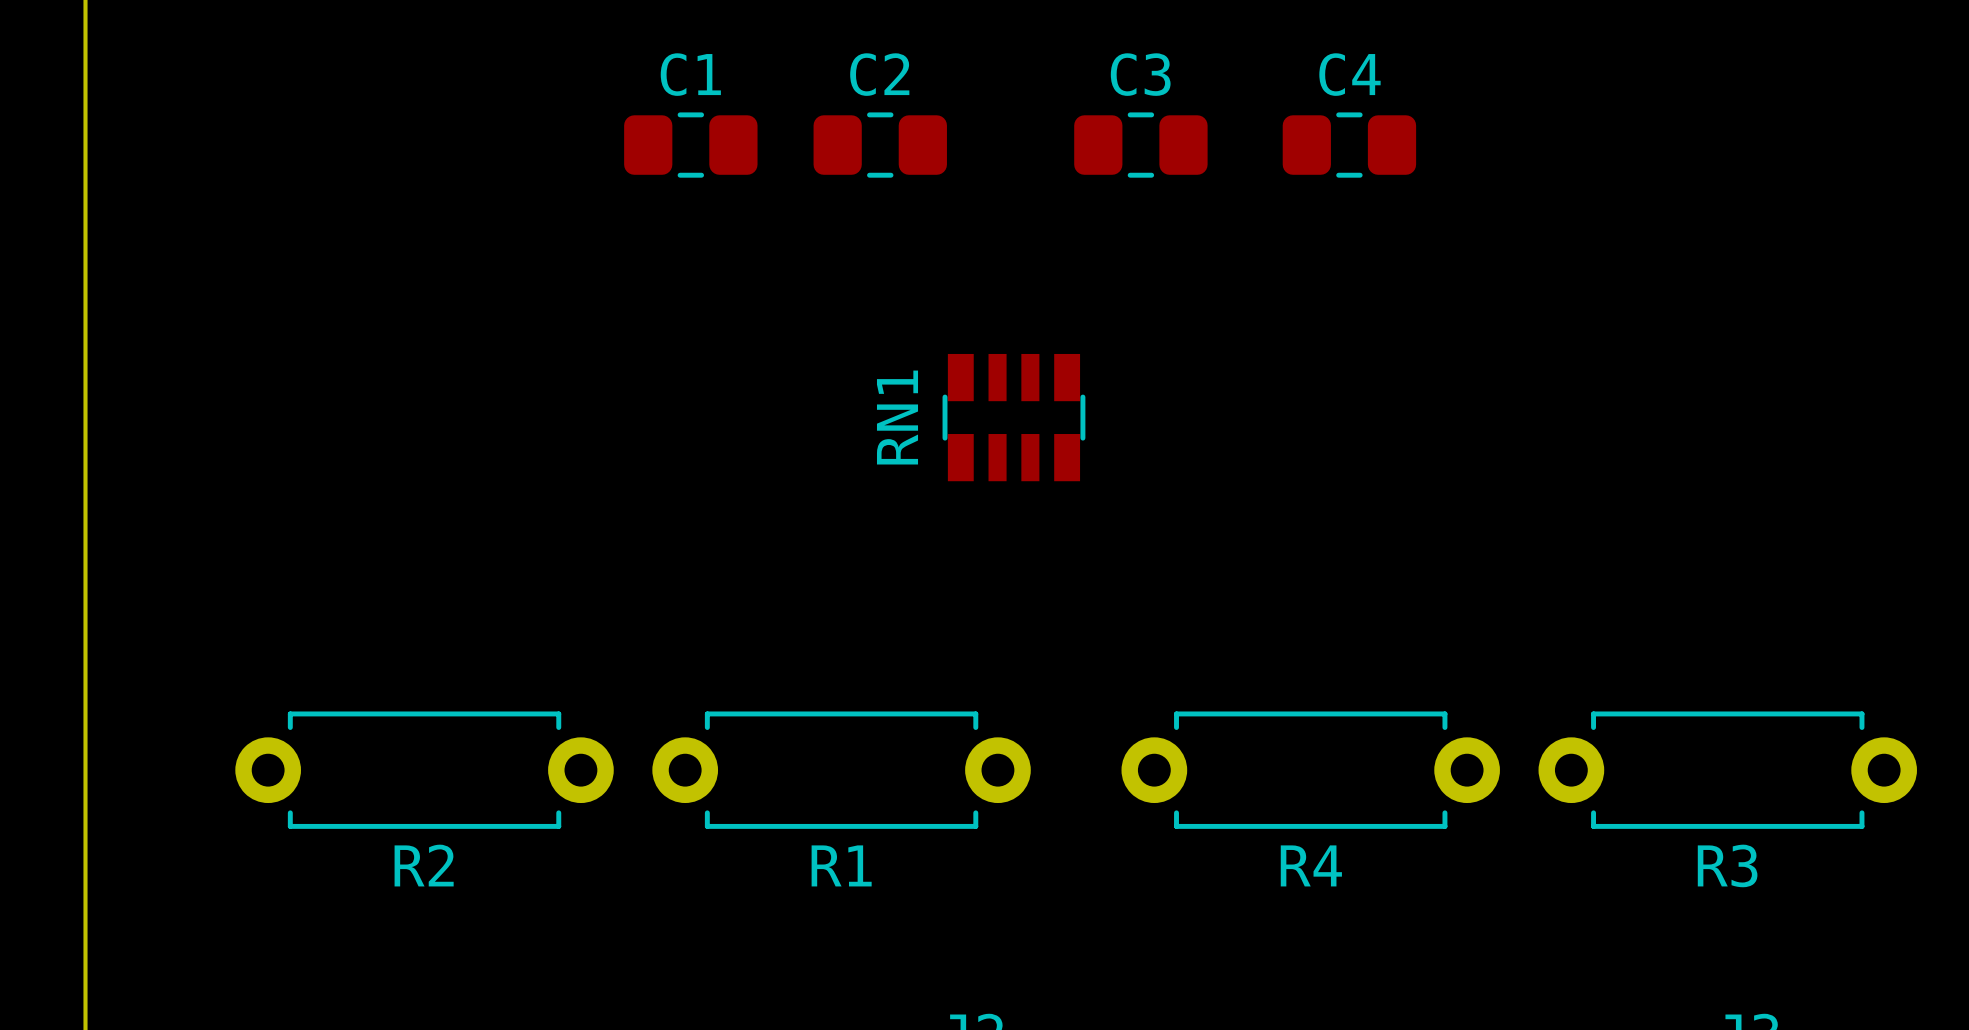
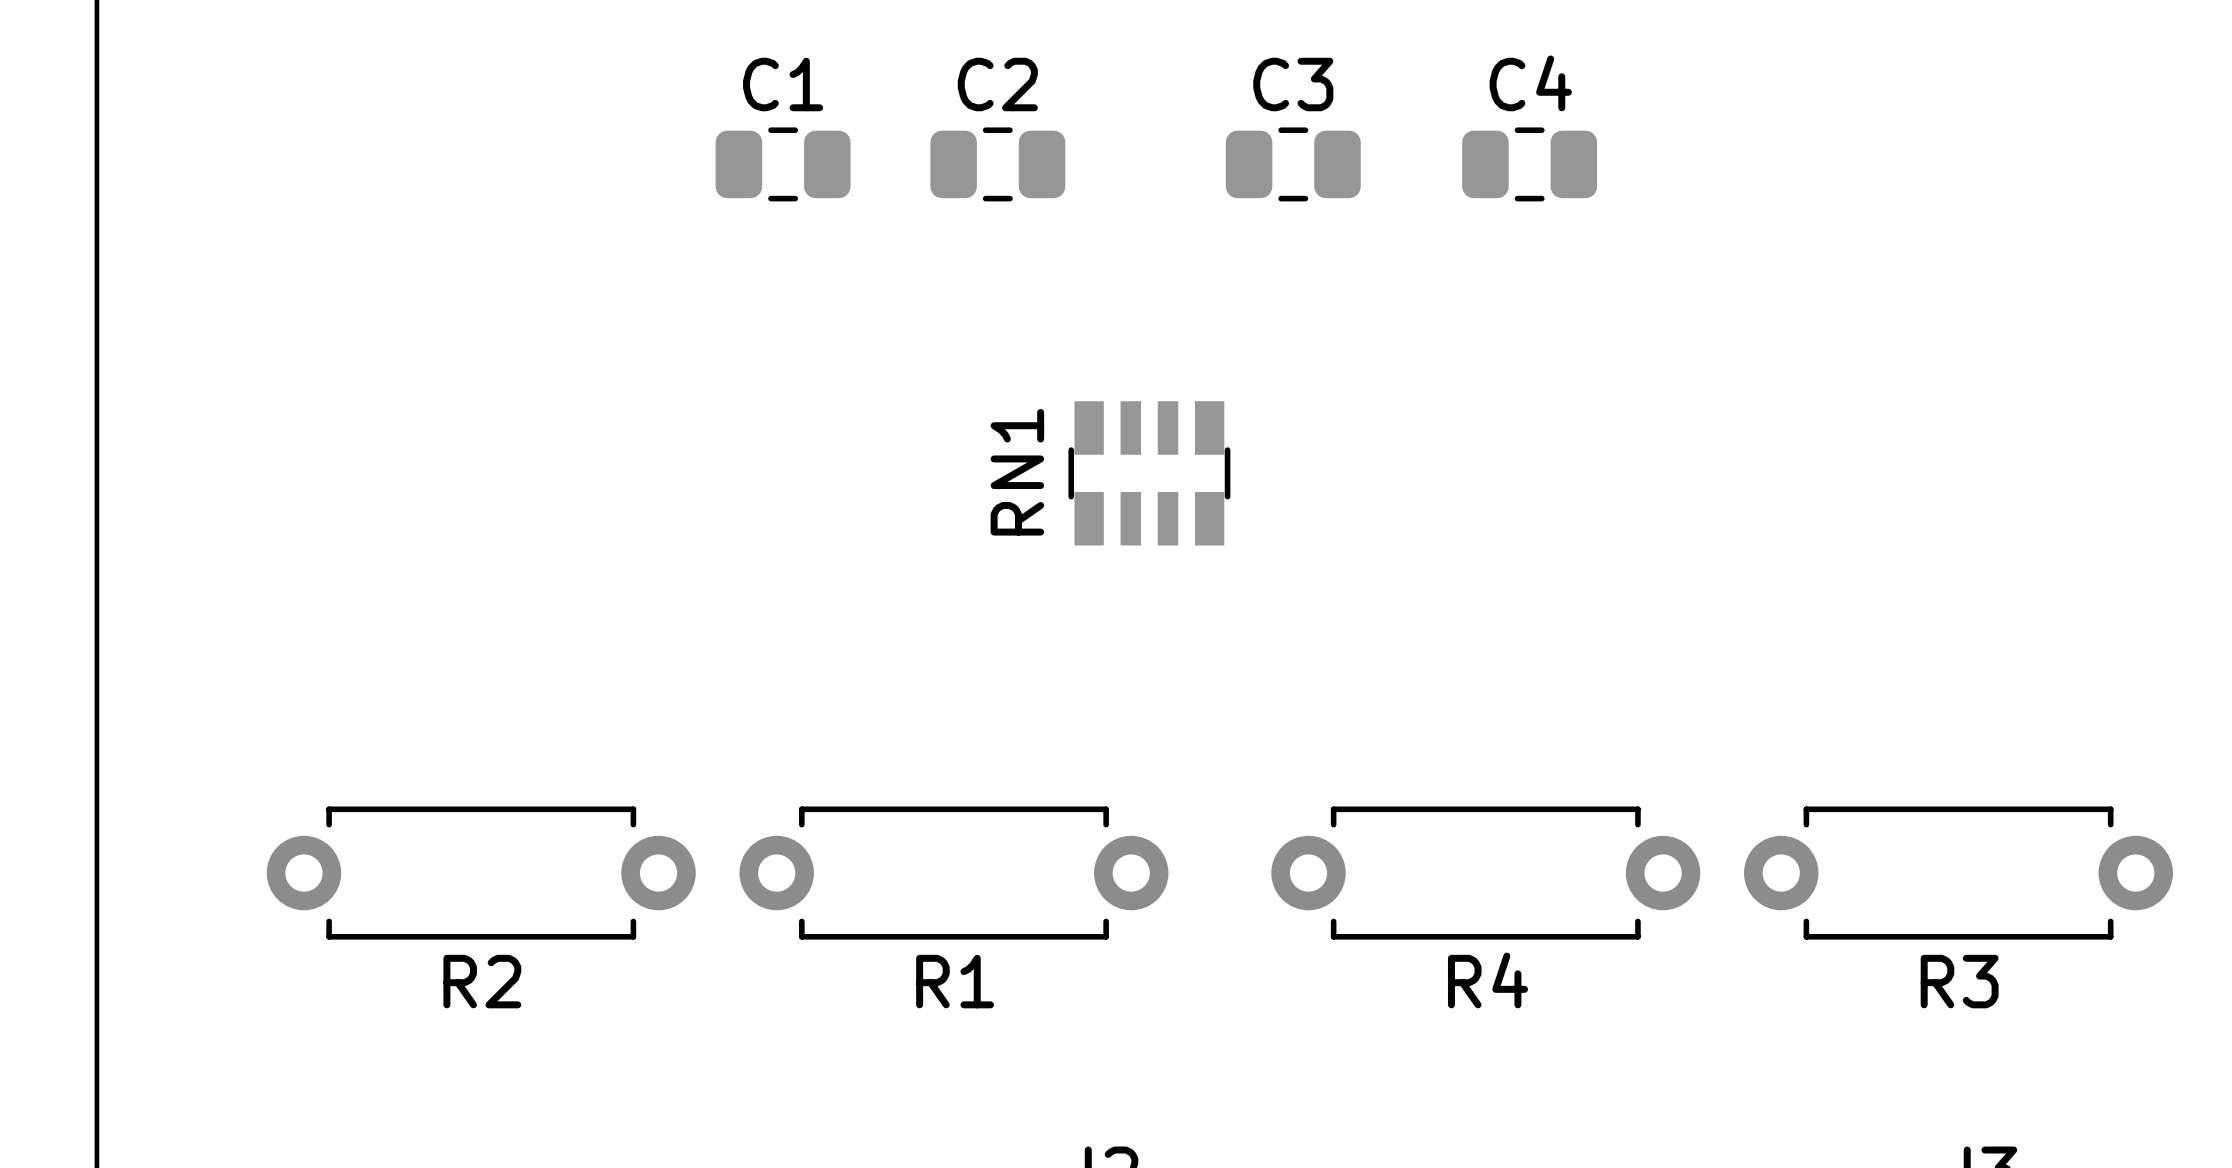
C1 footprint: [624, 112, 758, 178] -> [715, 127, 851, 202]
C2 footprint: [813, 112, 947, 178] -> [930, 127, 1066, 202]
C3 footprint: [1074, 112, 1208, 178] -> [1225, 127, 1361, 202]
C4 footprint: [1282, 112, 1417, 178] -> [1462, 127, 1598, 202]

